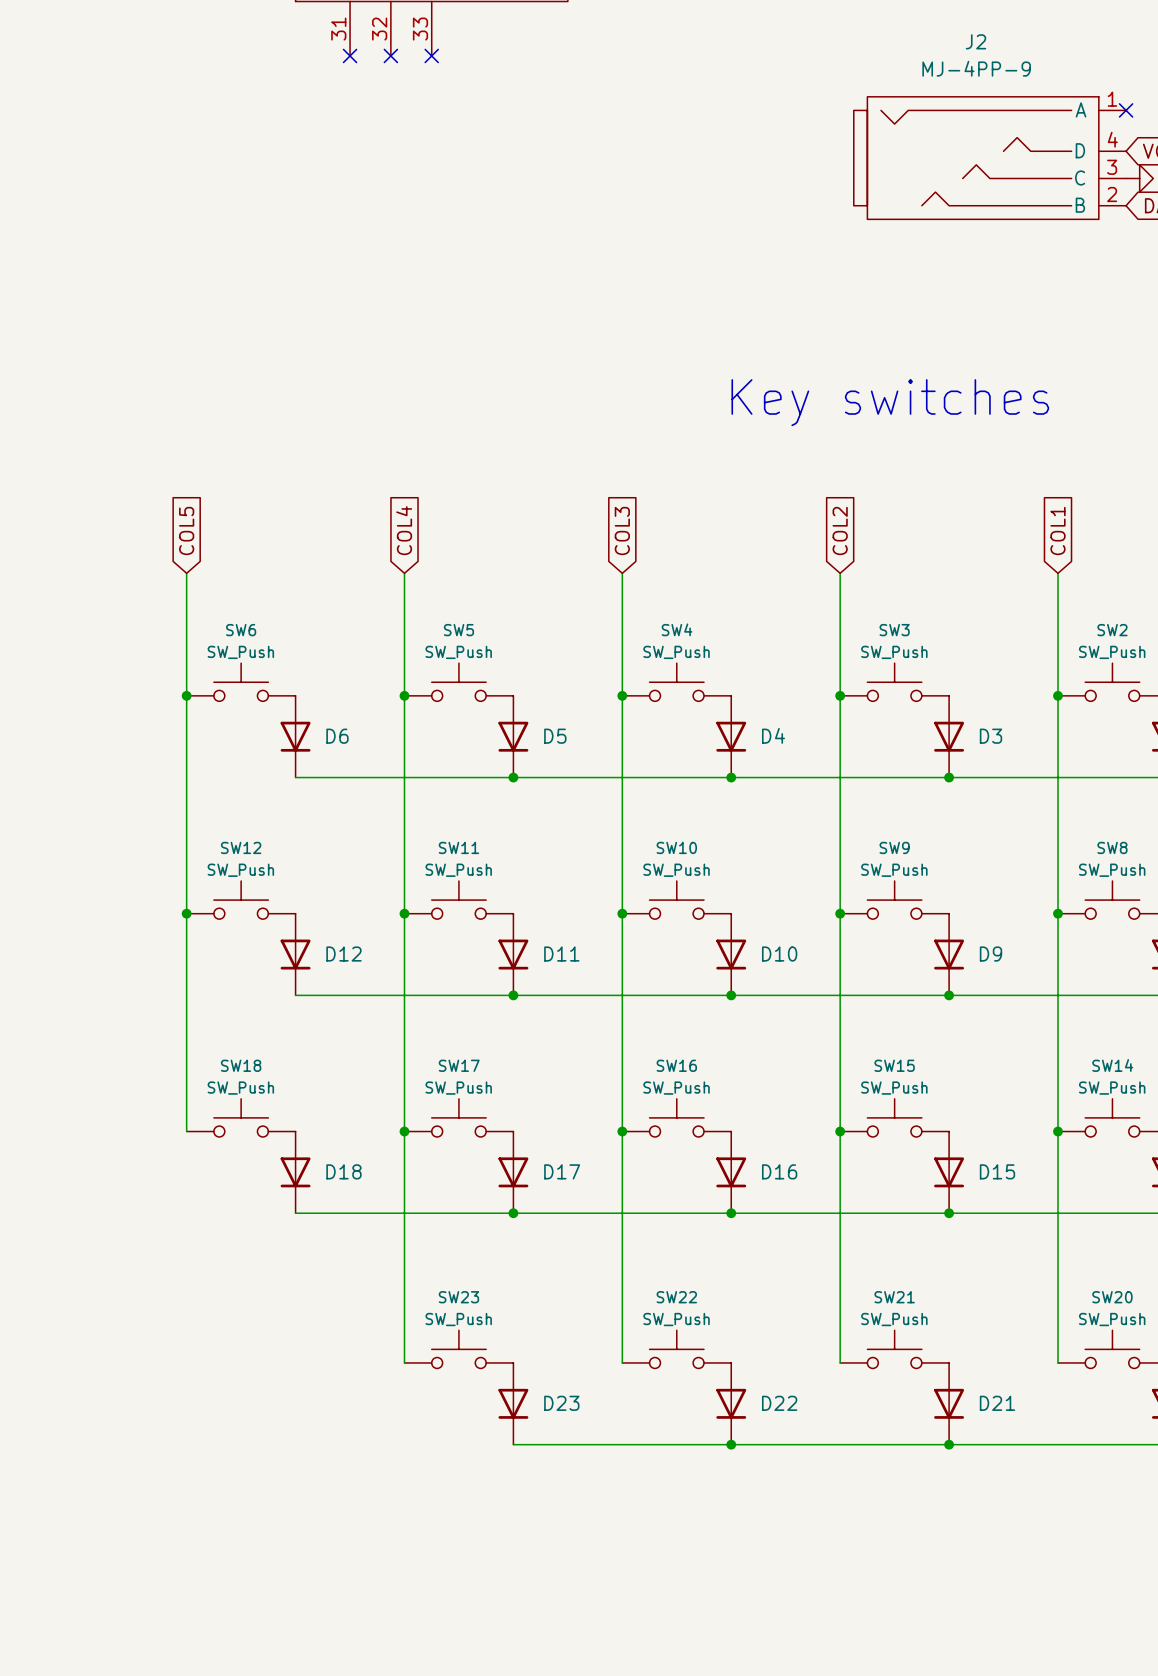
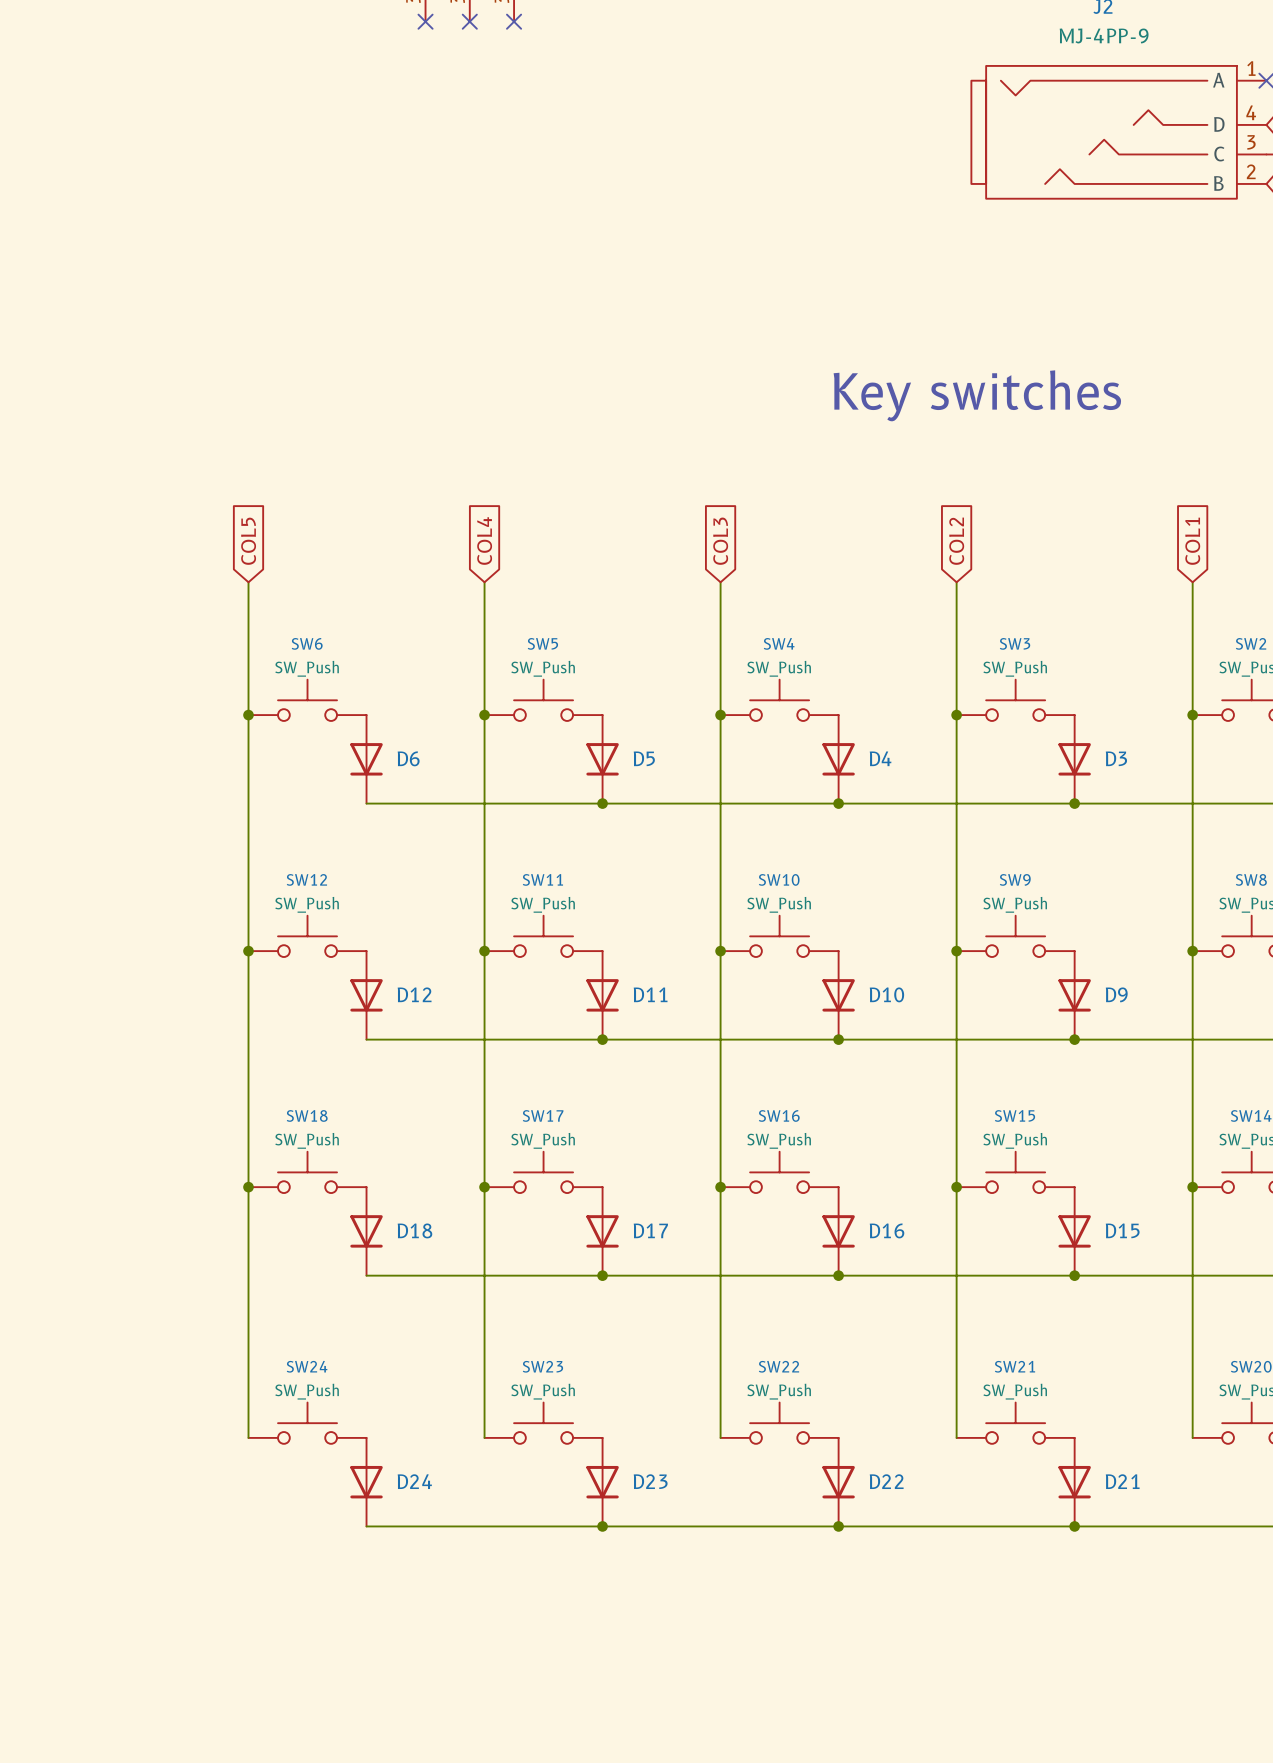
wire: none -> (248, 1187) (248, 1437)
junction: none -> (248, 1187)
SW24: none -> SW_Push (307, 1423)
D24: none -> (366, 1482)
wire: none -> (366, 1526) (602, 1526)
junction: none -> (602, 1526)

